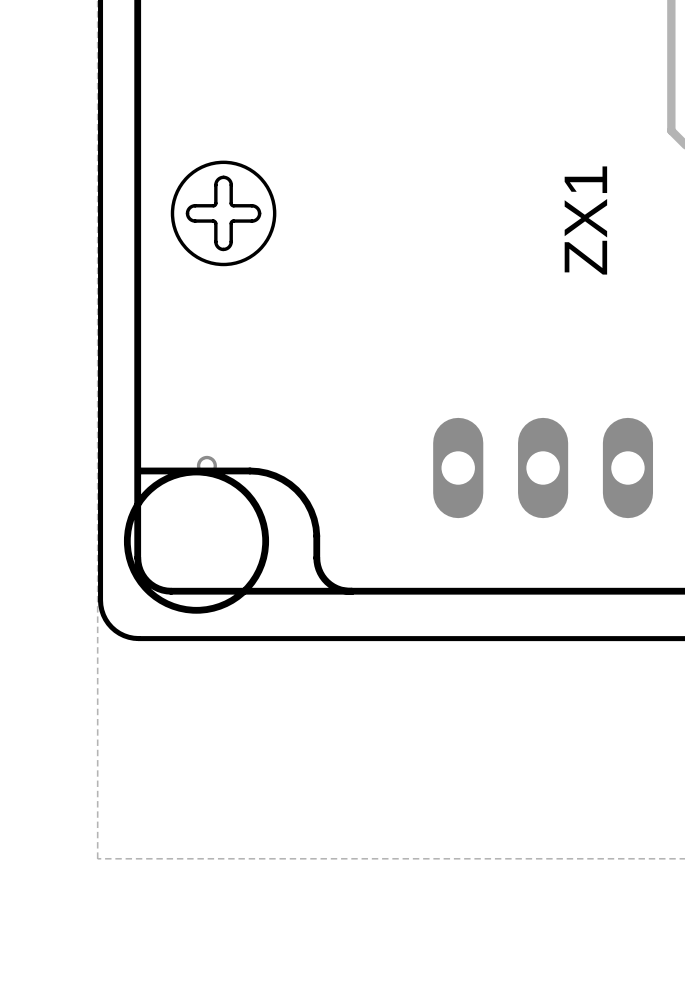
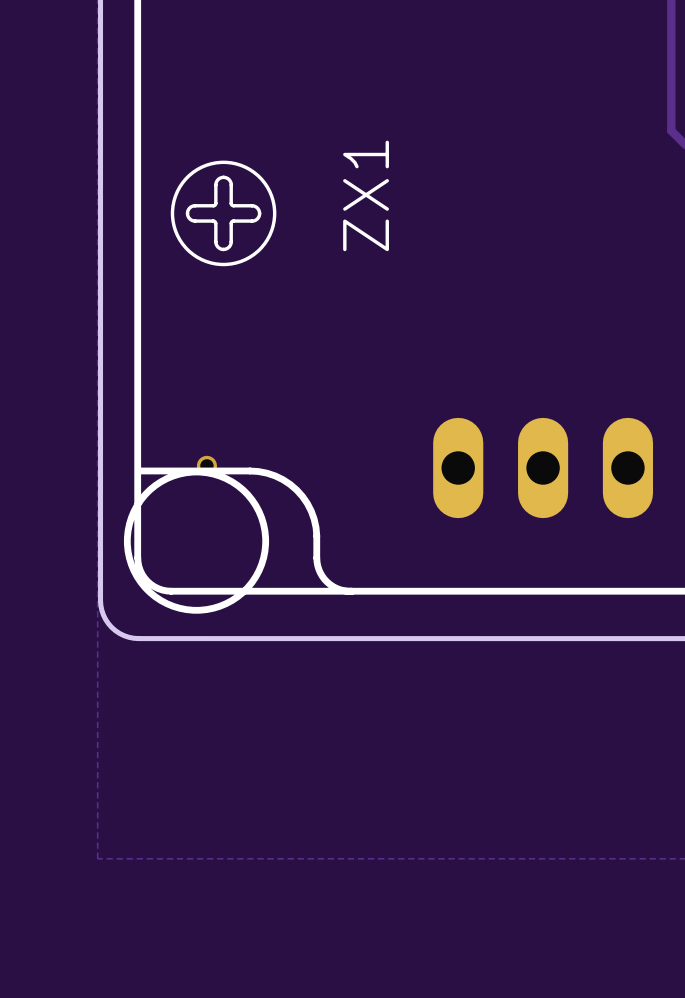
ZX1 name position: ZX1 (585, 220) -> ZX1 (366, 195)

